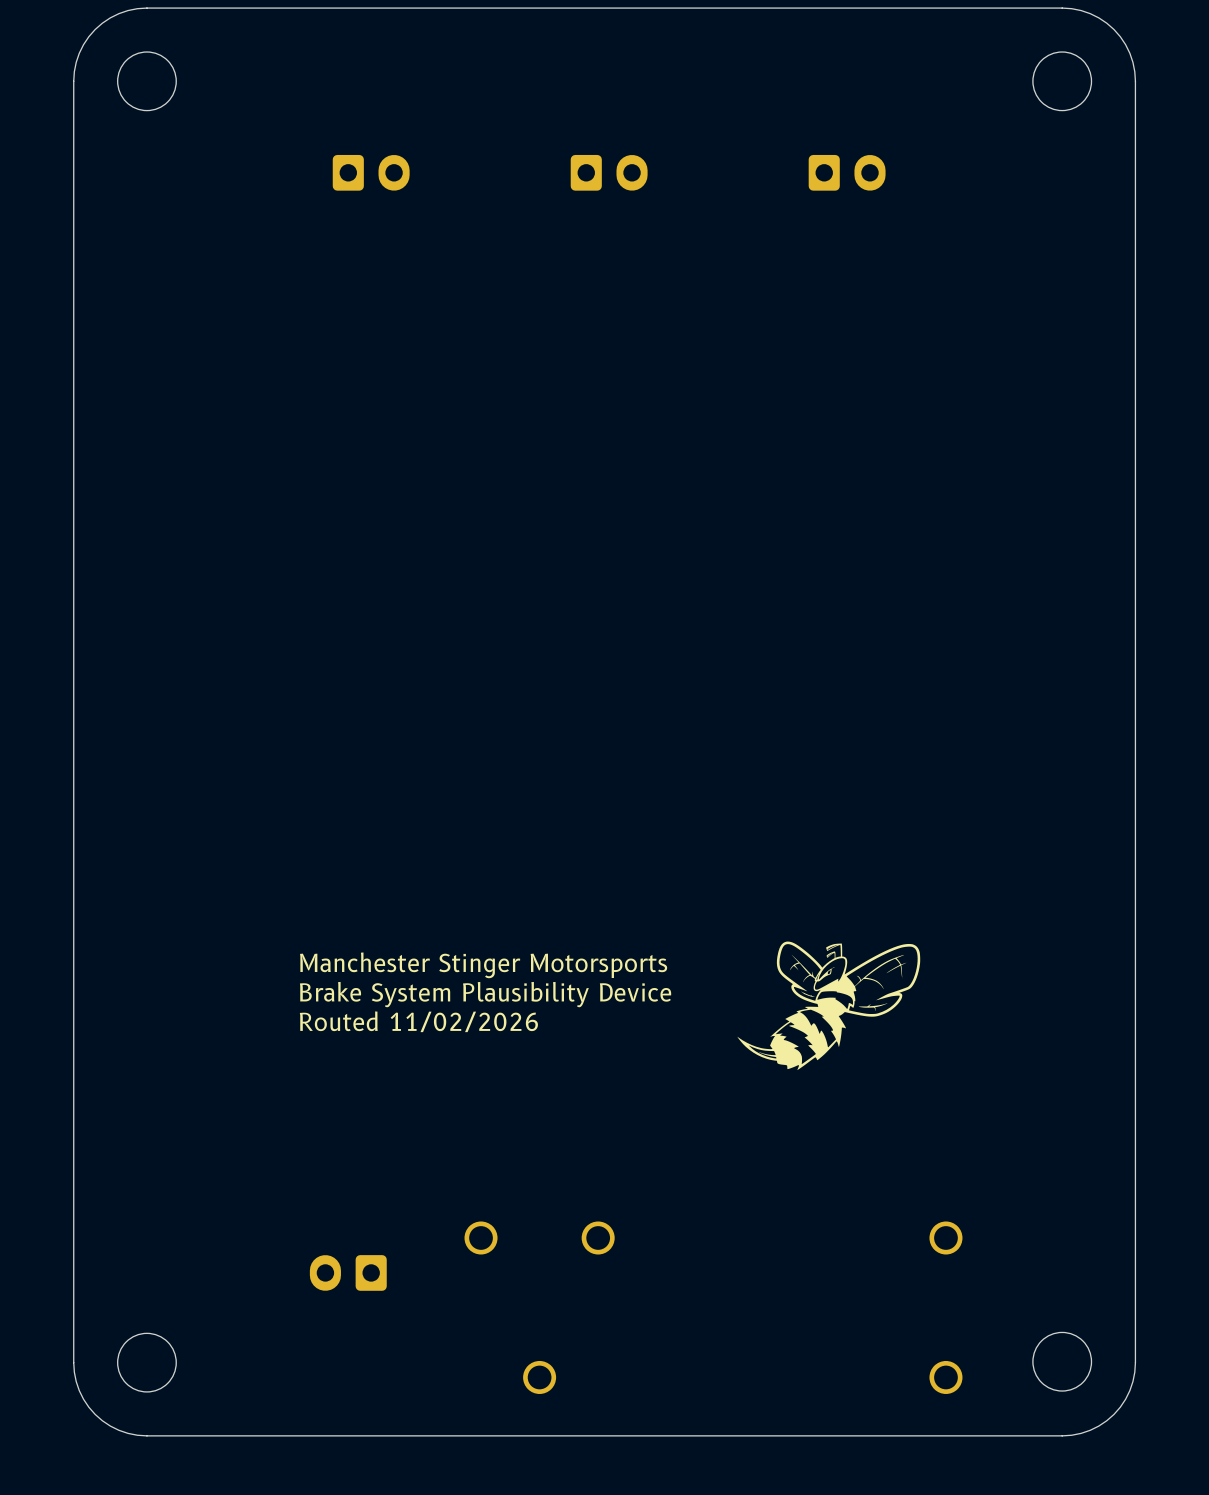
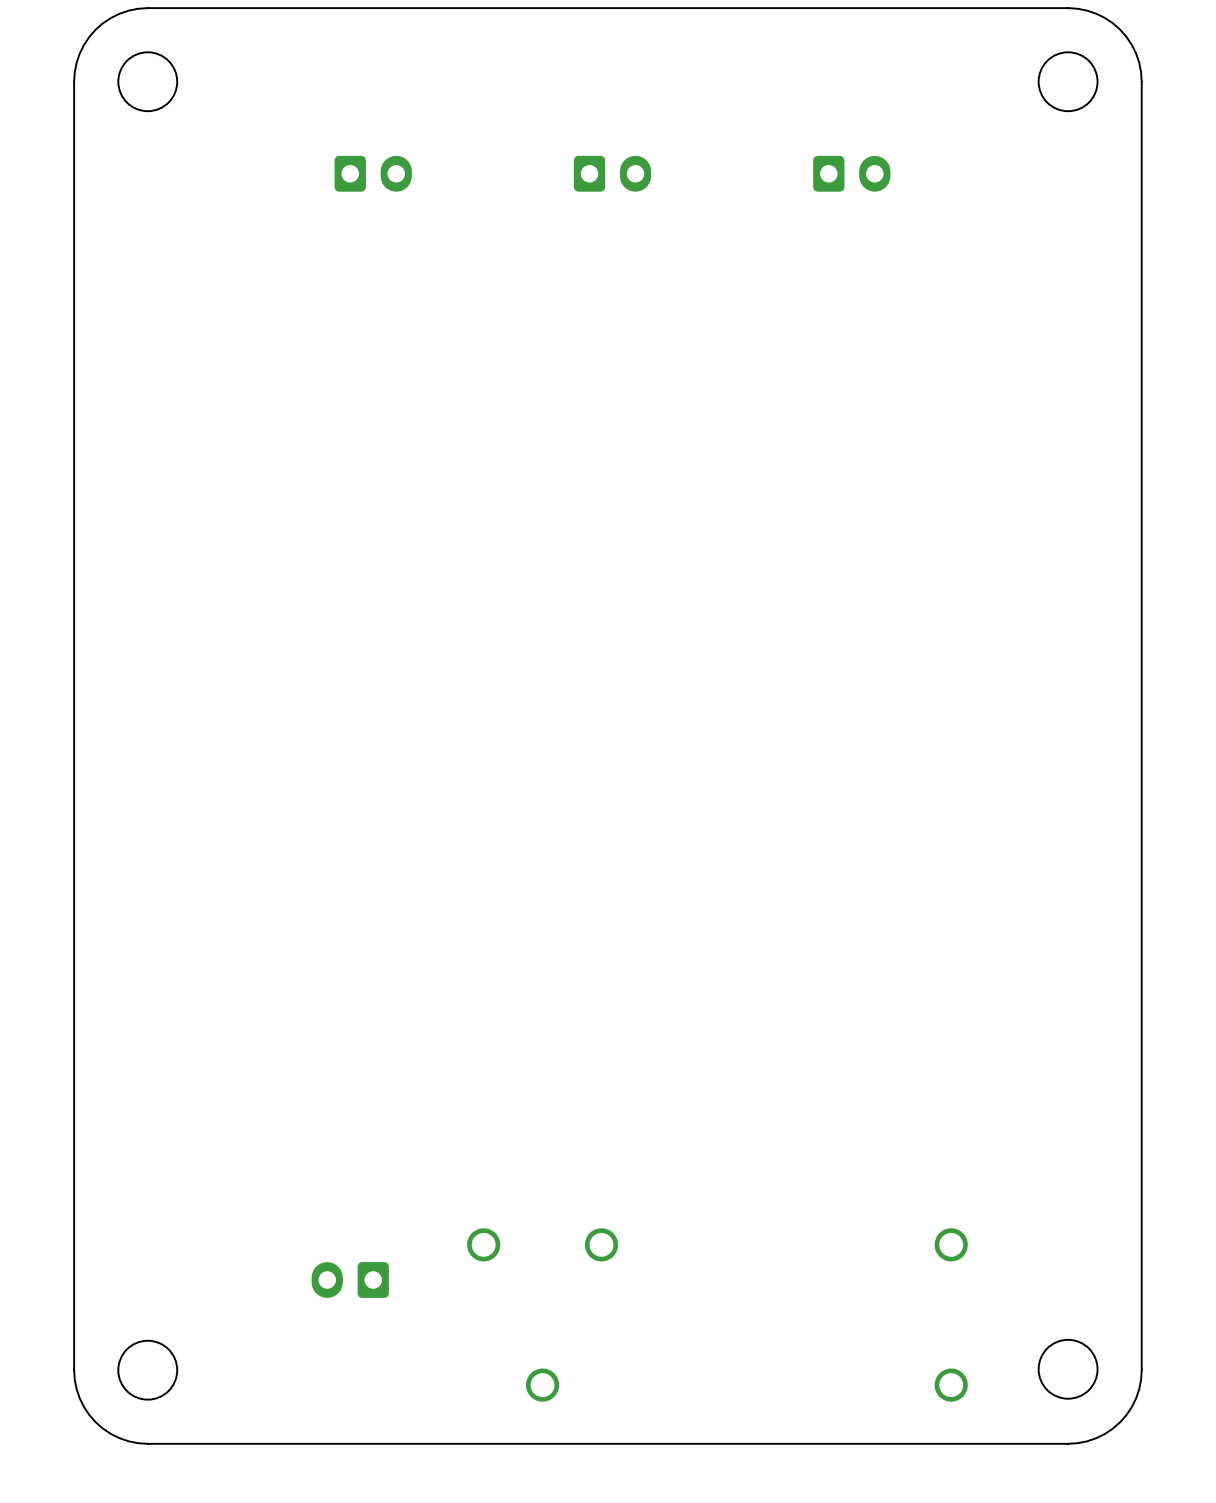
drawing: [737, 941, 921, 1071] -> none
text: Manchester Stinger Motorsports (483, 965) -> none
text: Brake System Plausibility Device (485, 994) -> none
text: Routed 11/02/2026 (418, 1021) -> none

